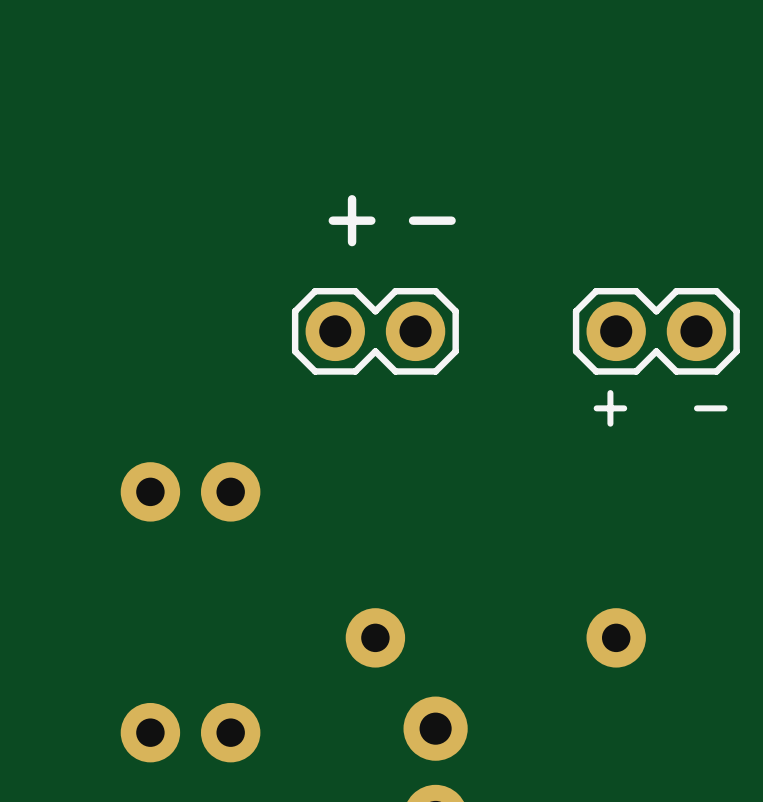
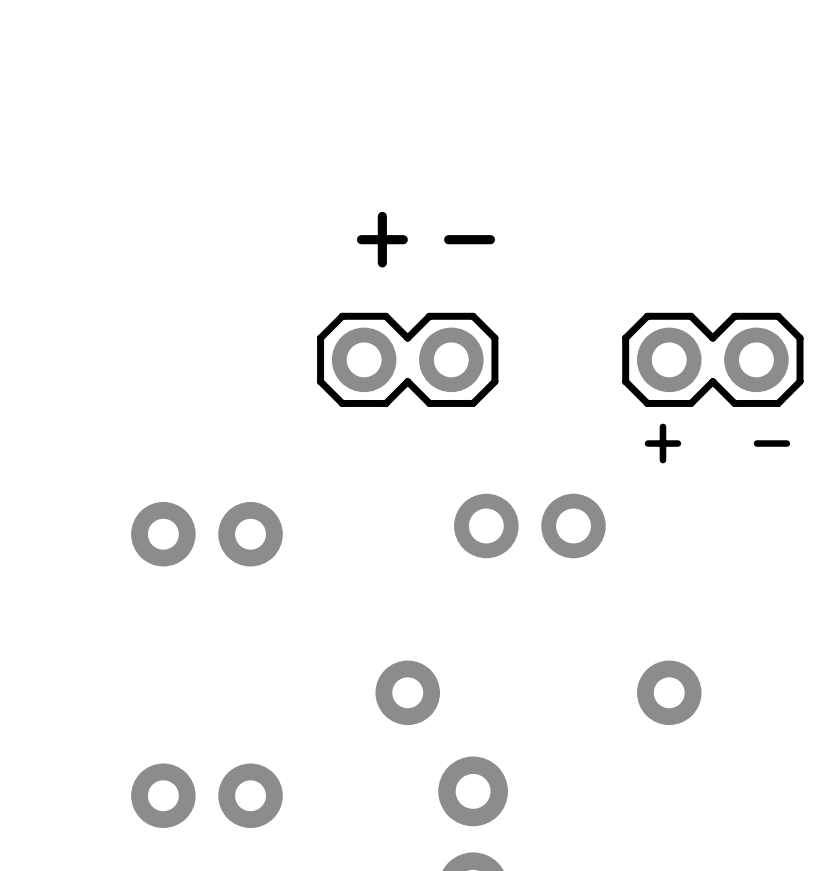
part: none -> (529, 525)

